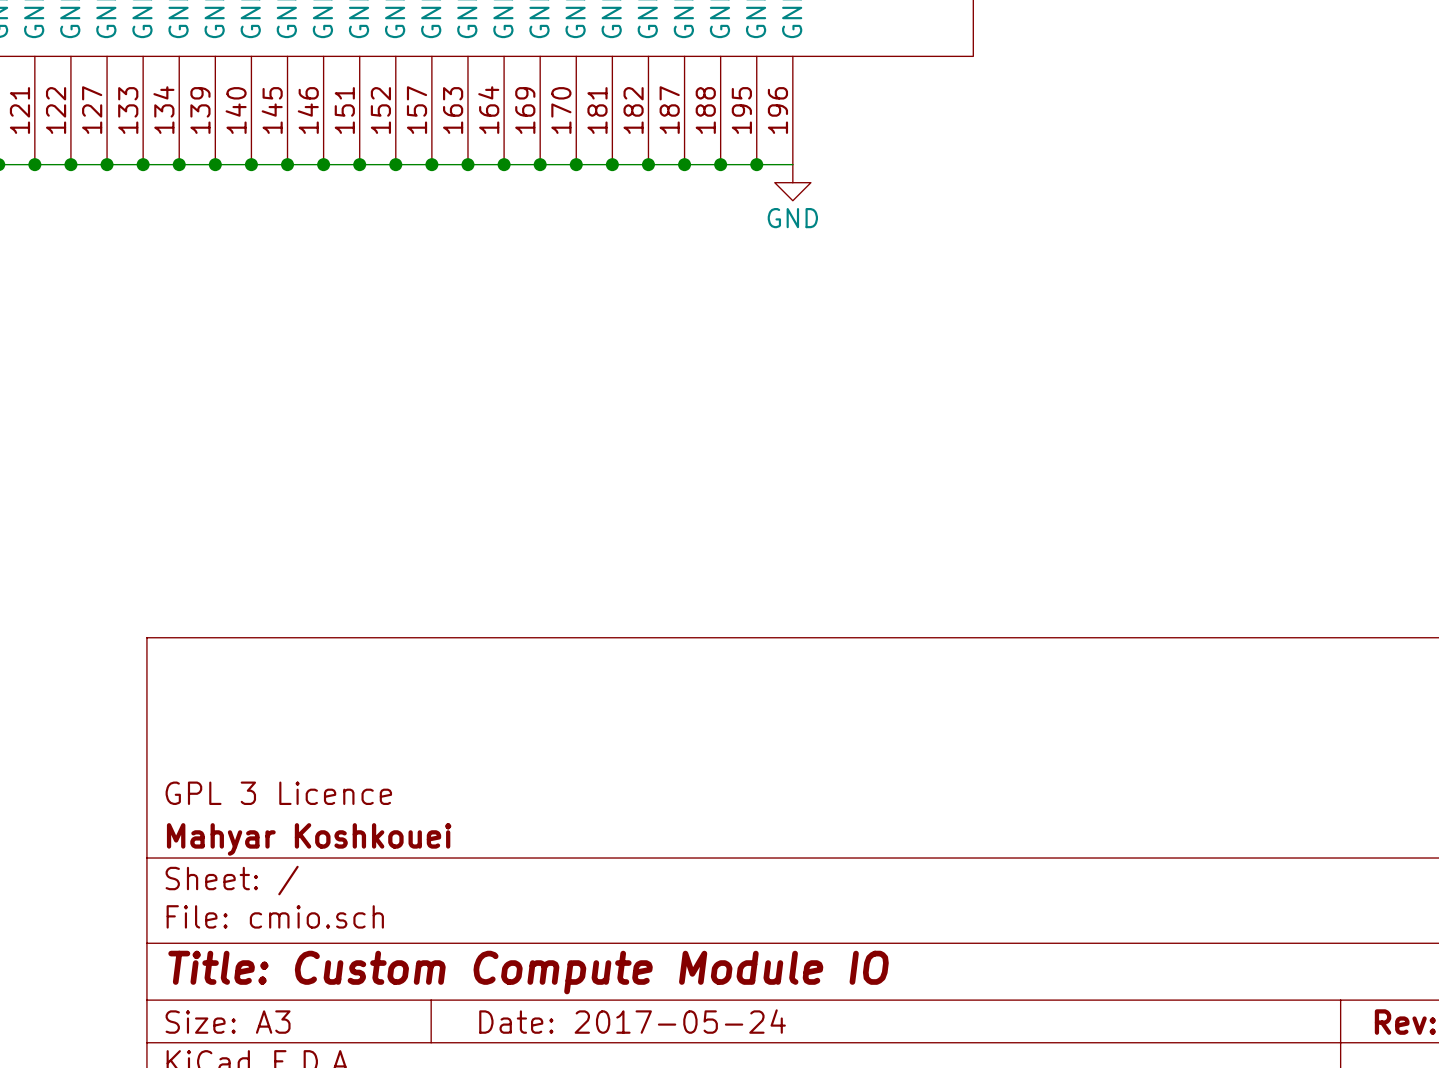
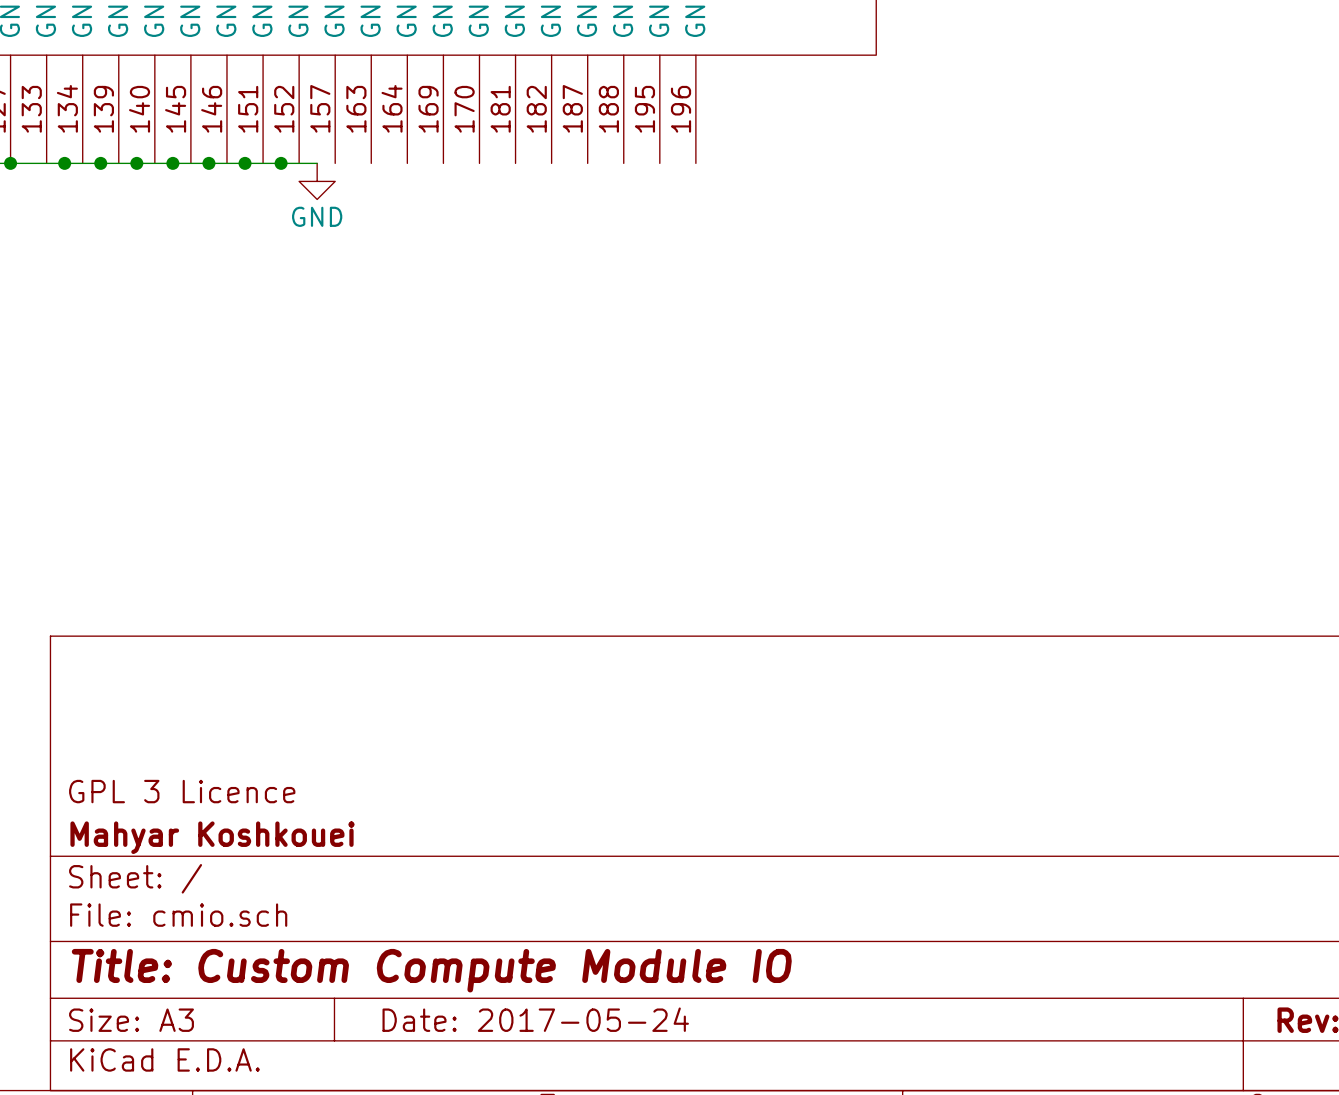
junction: (143, 164) -> none
junction: none -> (64, 163)
junction: (179, 164) -> none
junction: none -> (100, 163)
junction: (215, 164) -> none
junction: none -> (136, 163)
junction: (251, 164) -> none
junction: none -> (172, 163)
junction: (287, 164) -> none
junction: none -> (208, 163)
junction: (323, 164) -> none
junction: none -> (245, 163)
junction: (359, 164) -> none
junction: none -> (281, 163)
junction: (395, 164) -> none
wire: (413, 164) (792, 164) -> none
junction: (431, 164) -> none
junction: (467, 164) -> none
junction: (504, 164) -> none
junction: (540, 164) -> none
junction: (576, 164) -> none
junction: (612, 164) -> none
junction: (648, 164) -> none
junction: (684, 164) -> none
junction: (720, 164) -> none
junction: (756, 164) -> none
power symbol: none -> GND (317, 181)
power symbol: GND (792, 182) -> none

